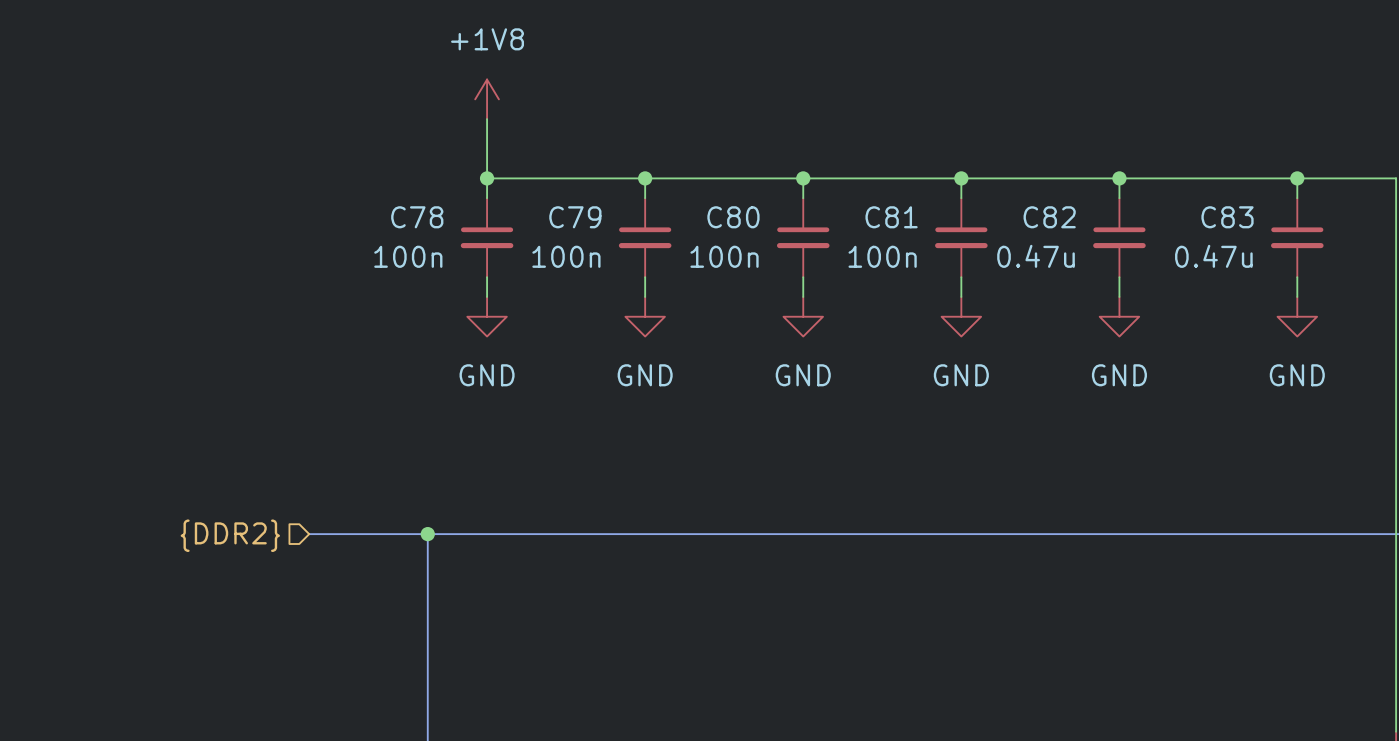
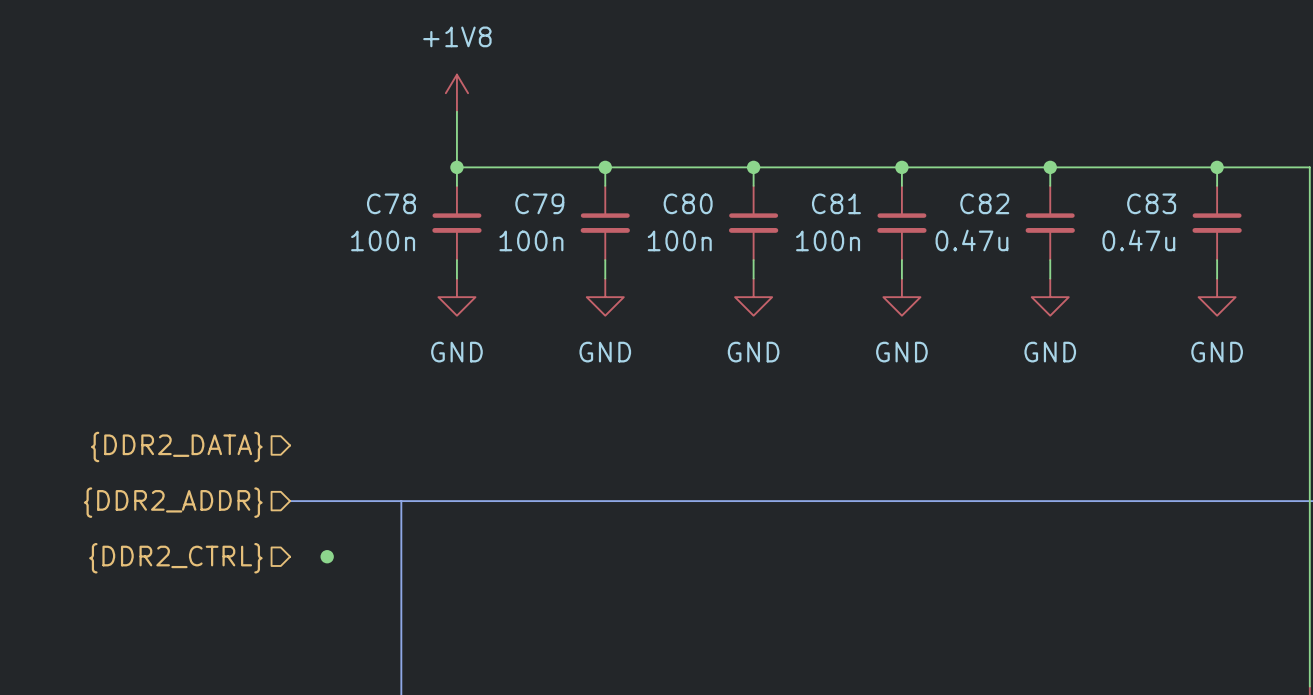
hierarchical label: none -> {DDR2_DATA} (176, 446)
junction: (427, 534) -> none
hierarchical label: {DDR2} (230, 535) -> {DDR2_ADDR} (173, 502)
junction: none -> (327, 556)
hierarchical label: none -> {DDR2_CTRL} (175, 558)

